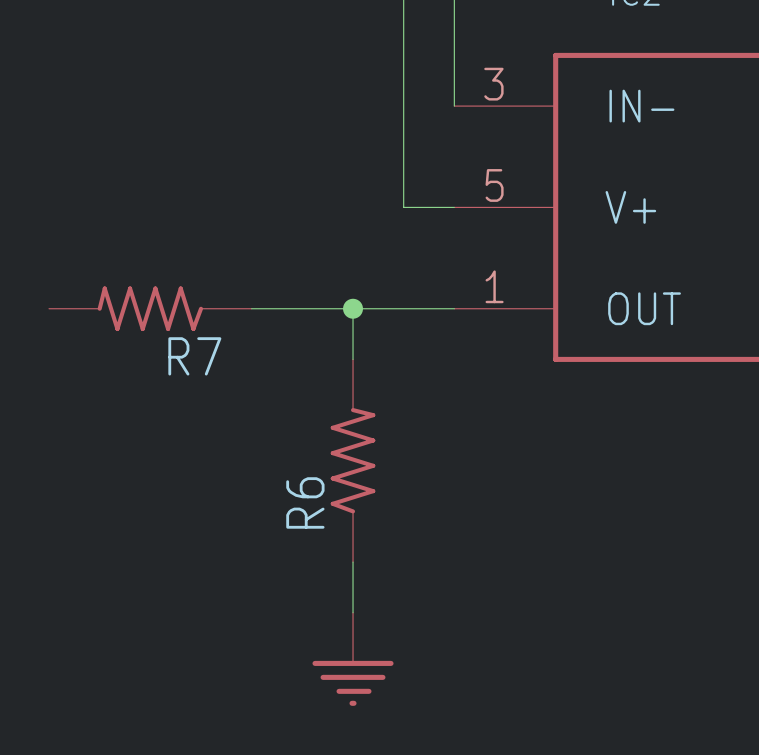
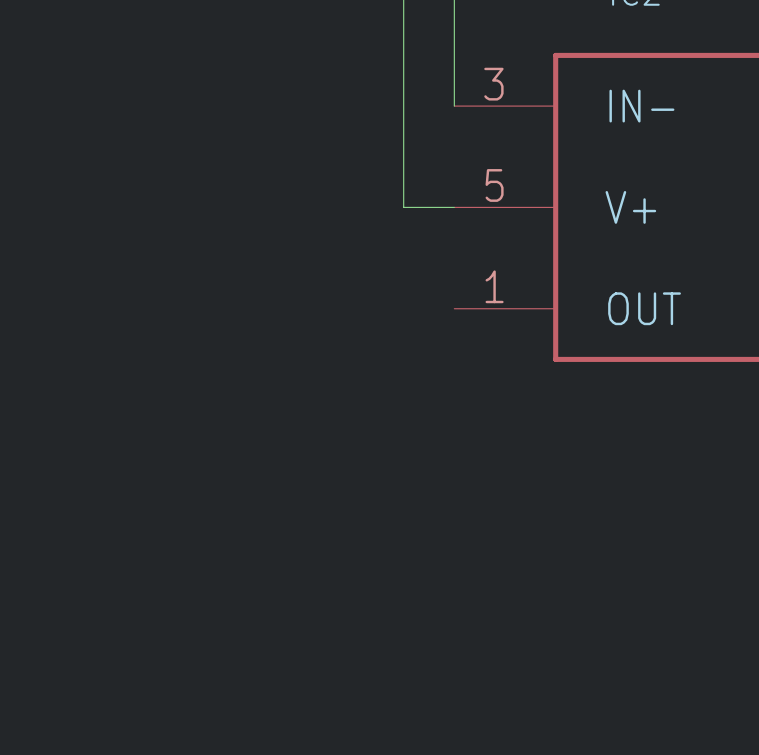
R7: (150, 308) -> none
wire: (251, 308) (454, 308) -> none
wire: (353, 308) (353, 359) -> none
junction: (353, 308) -> none
R6: (353, 460) -> none
wire: (353, 562) (353, 612) -> none
power symbol: (353, 659) -> none

